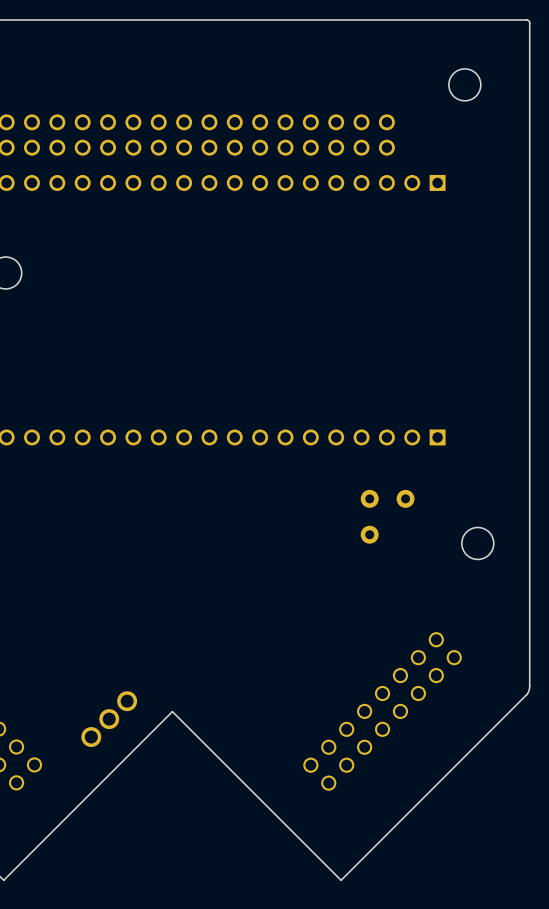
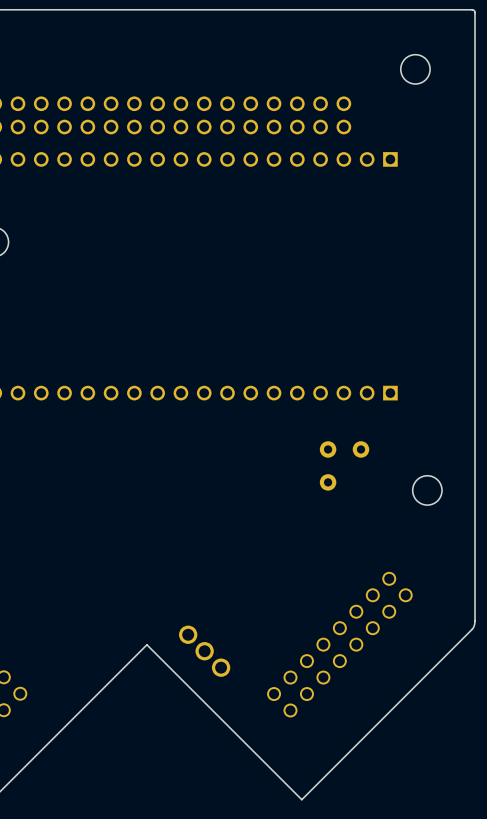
part rotation: 0° (109, 719) -> 90° clockwise (204, 651)
part position: (109, 719) -> (204, 651)

